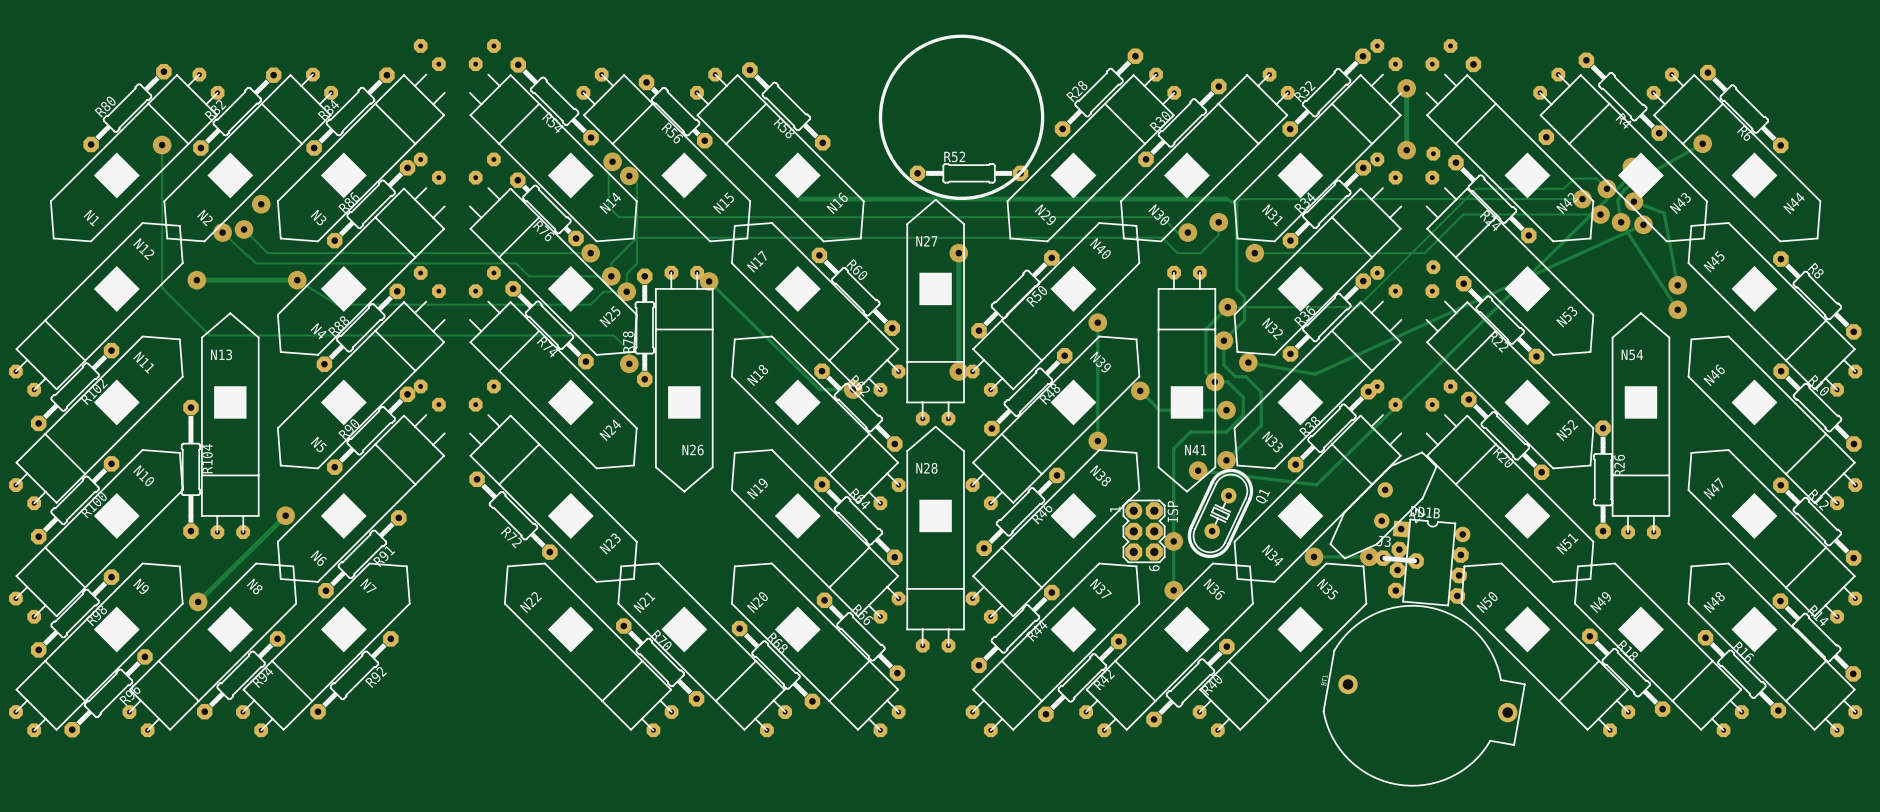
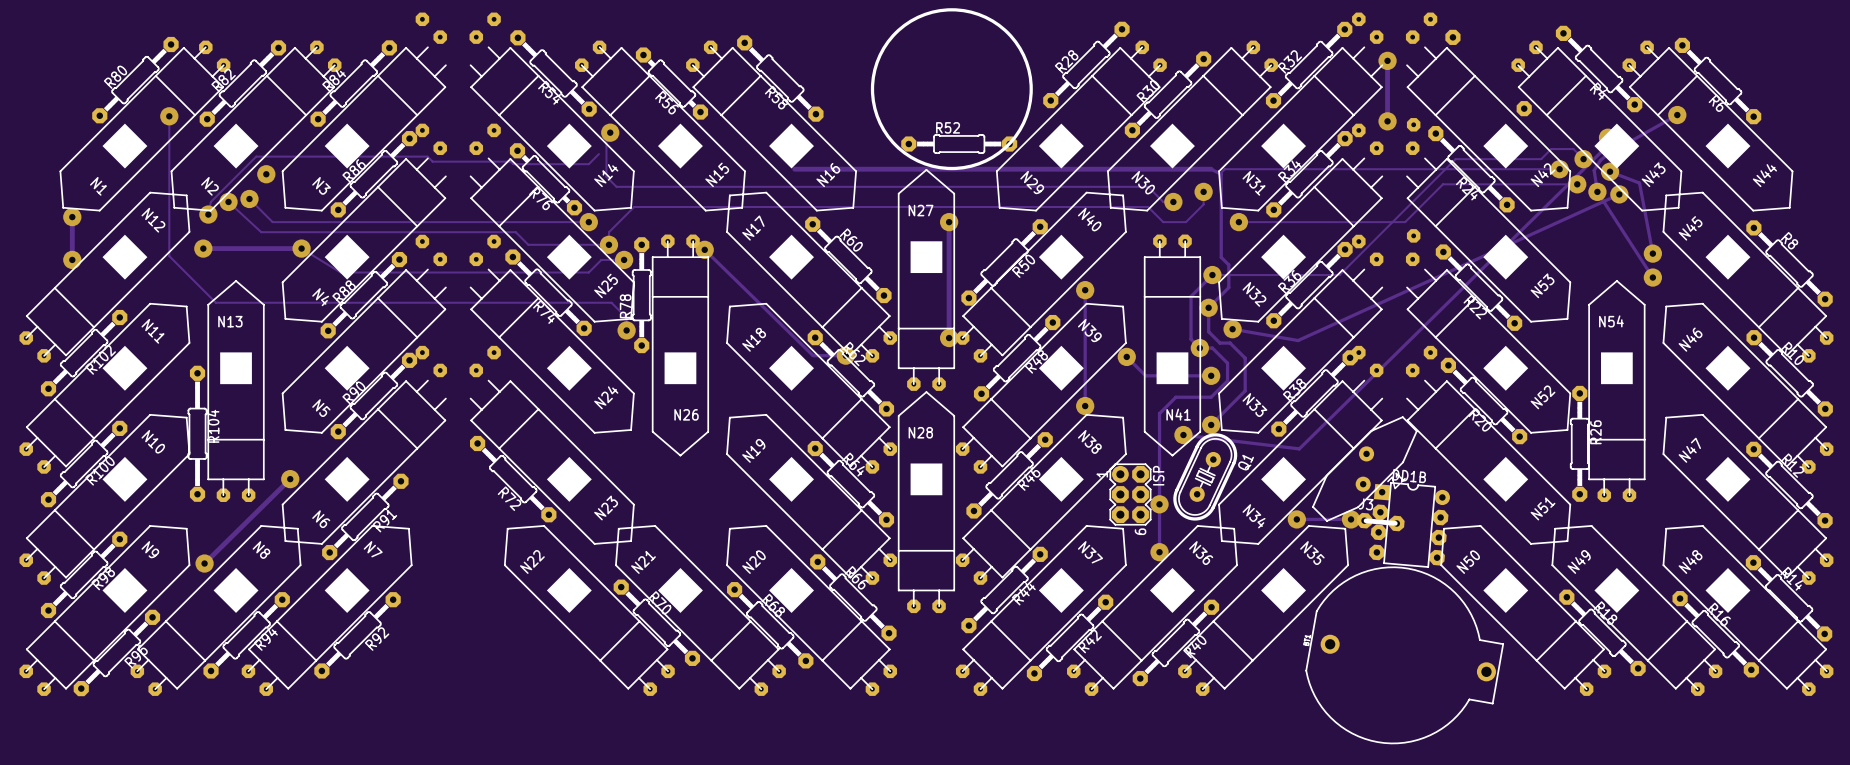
track: (629, 175) (637, 183) (637, 263) (626, 273) (626, 291) -> none
via: (629, 175) -> none
track: none -> (598, 154) (588, 164) (432, 161) (427, 156) (256, 156) (210, 201) (208, 214)
via: none -> (208, 214)
track: none -> (72, 217) (72, 259)
via: none -> (72, 217)
via: none -> (72, 259)

